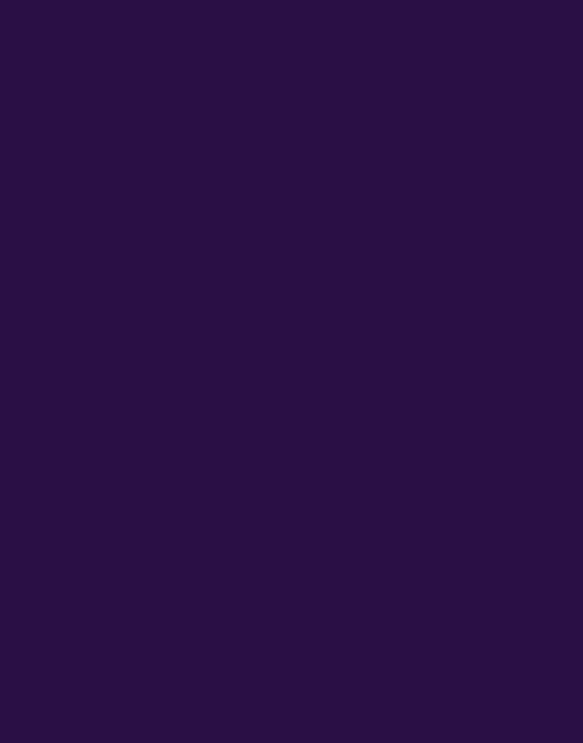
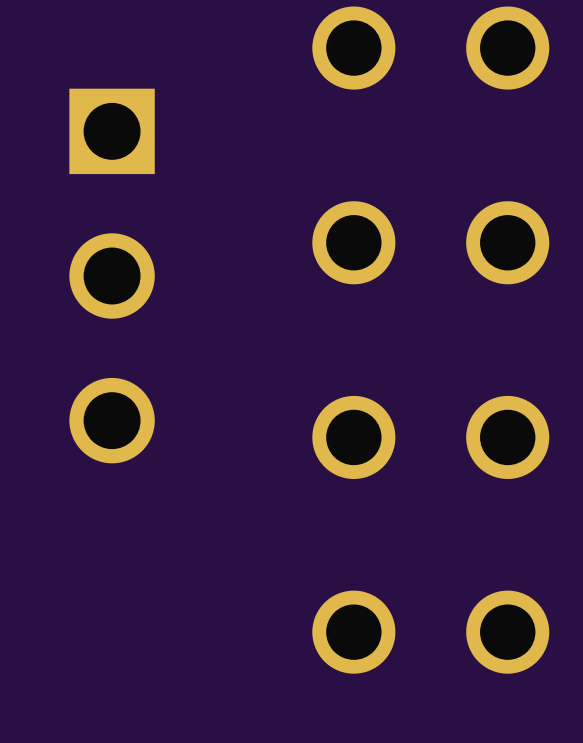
part: none -> (430, 48)
part: none -> (430, 242)
part: none -> (112, 276)
part: none -> (430, 437)
part: none -> (430, 632)

